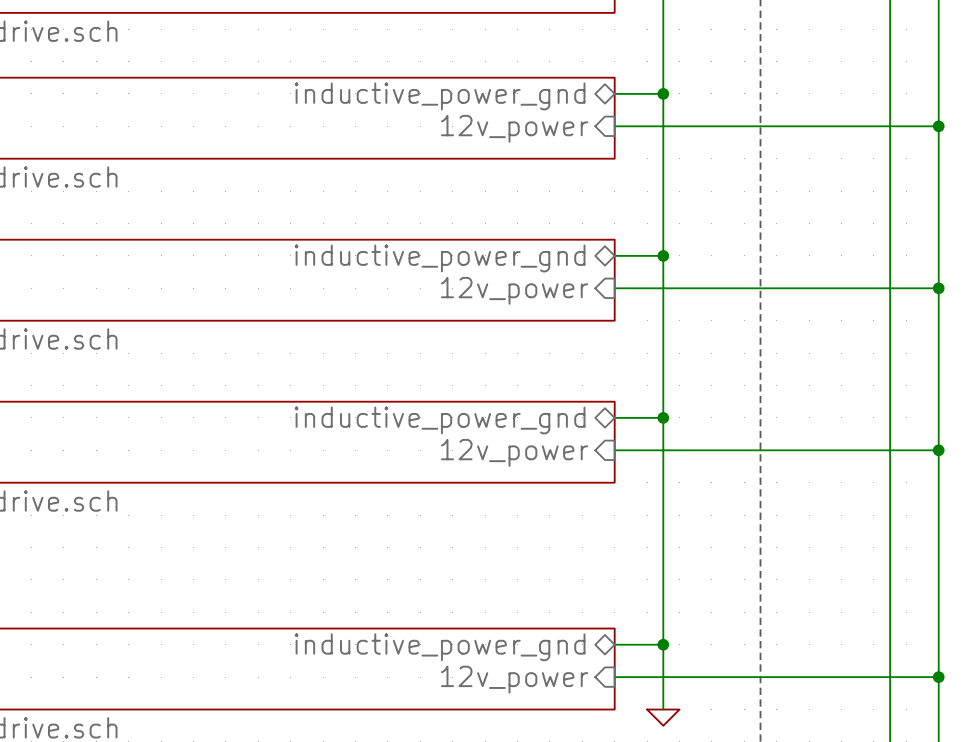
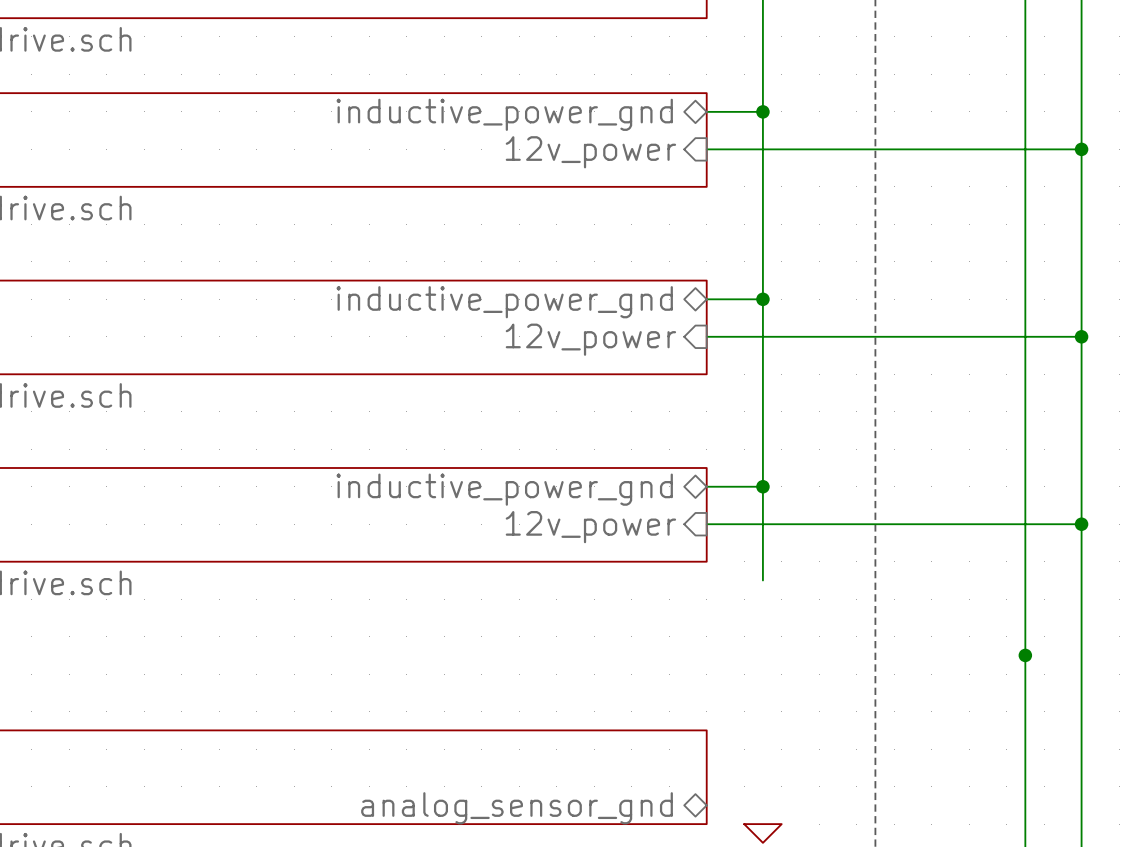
wire: (663, 498) (663, 709) -> none
junction: none -> (1025, 655)
wire: (614, 644) (663, 644) -> none
junction: (663, 644) -> none
sheet pin: inductive_power_gnd (440, 647) -> none
wire: (614, 677) (938, 677) -> none
junction: (938, 677) -> none
sheet pin: 12v_power (514, 679) -> none
sheet pin: none -> analog_sensor_gnd (517, 808)

